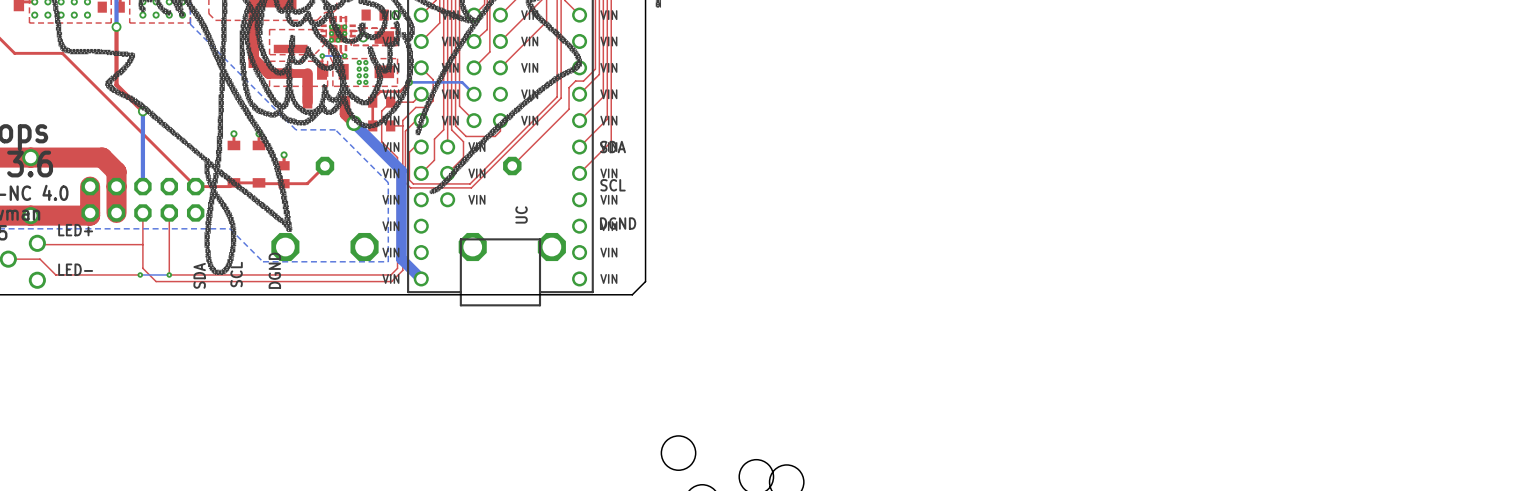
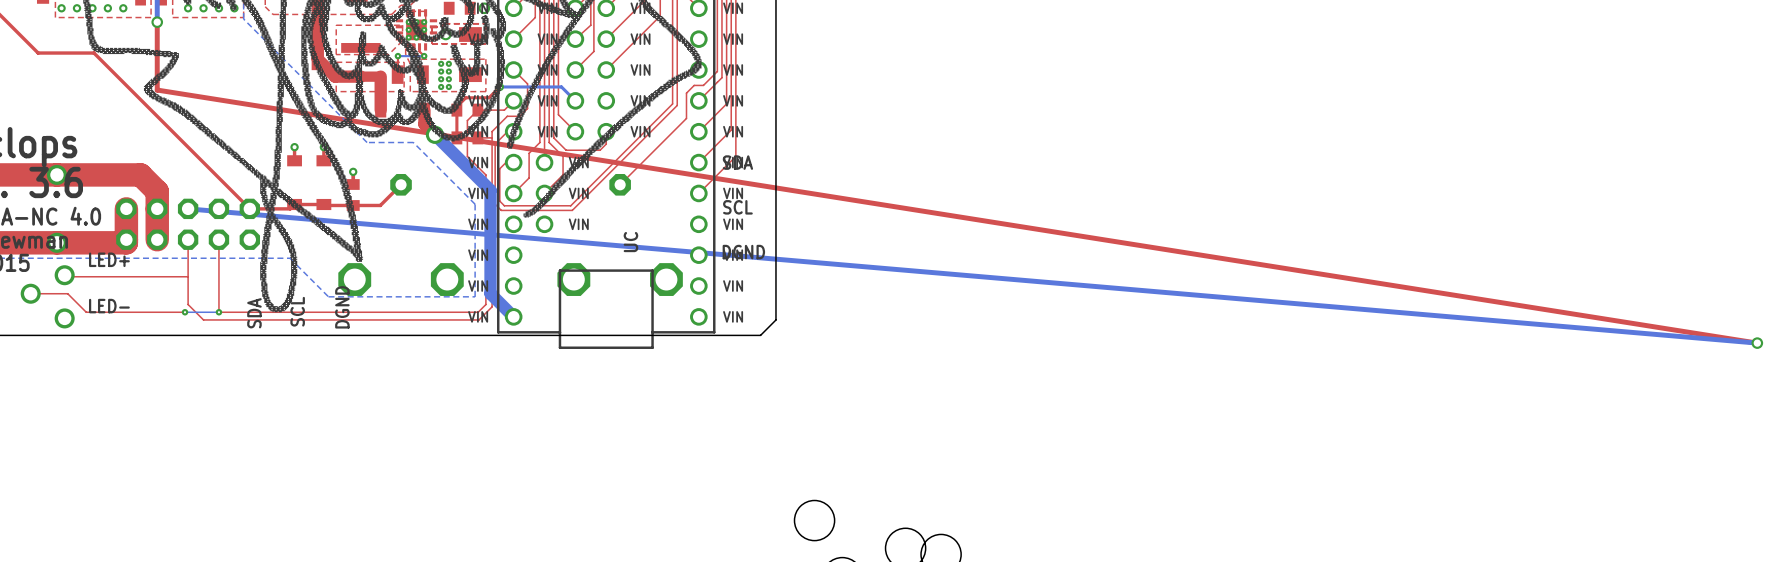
top track: (116, 85) (142, 111) -> (157, 90) (1757, 343)
bottom track: (142, 111) (142, 186) -> (1757, 343) (188, 208)
via: (142, 111) -> none
via: none -> (1757, 343)

